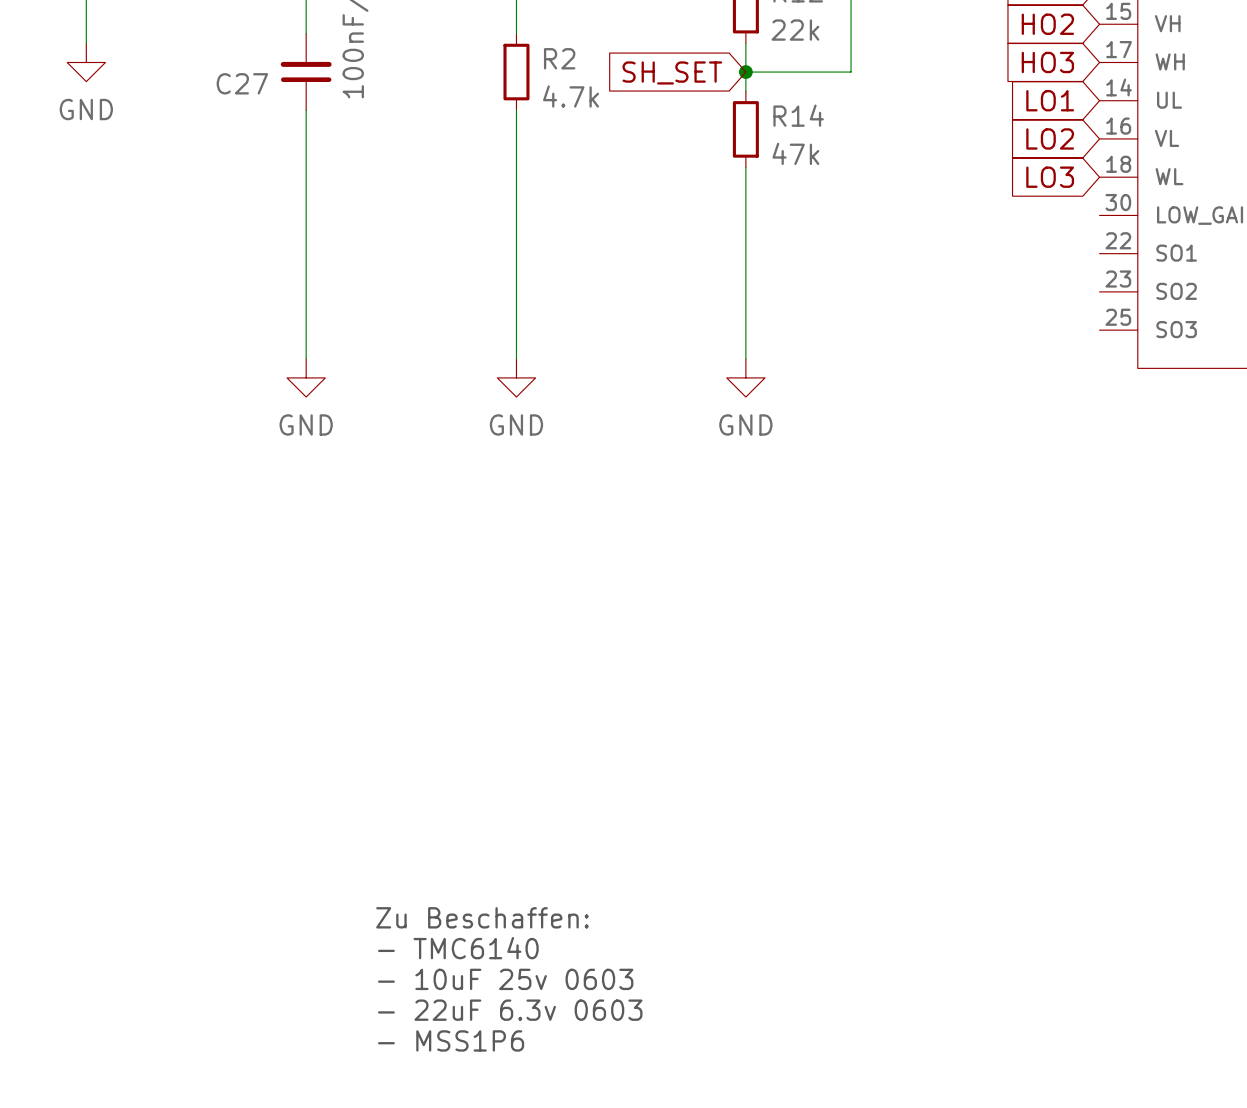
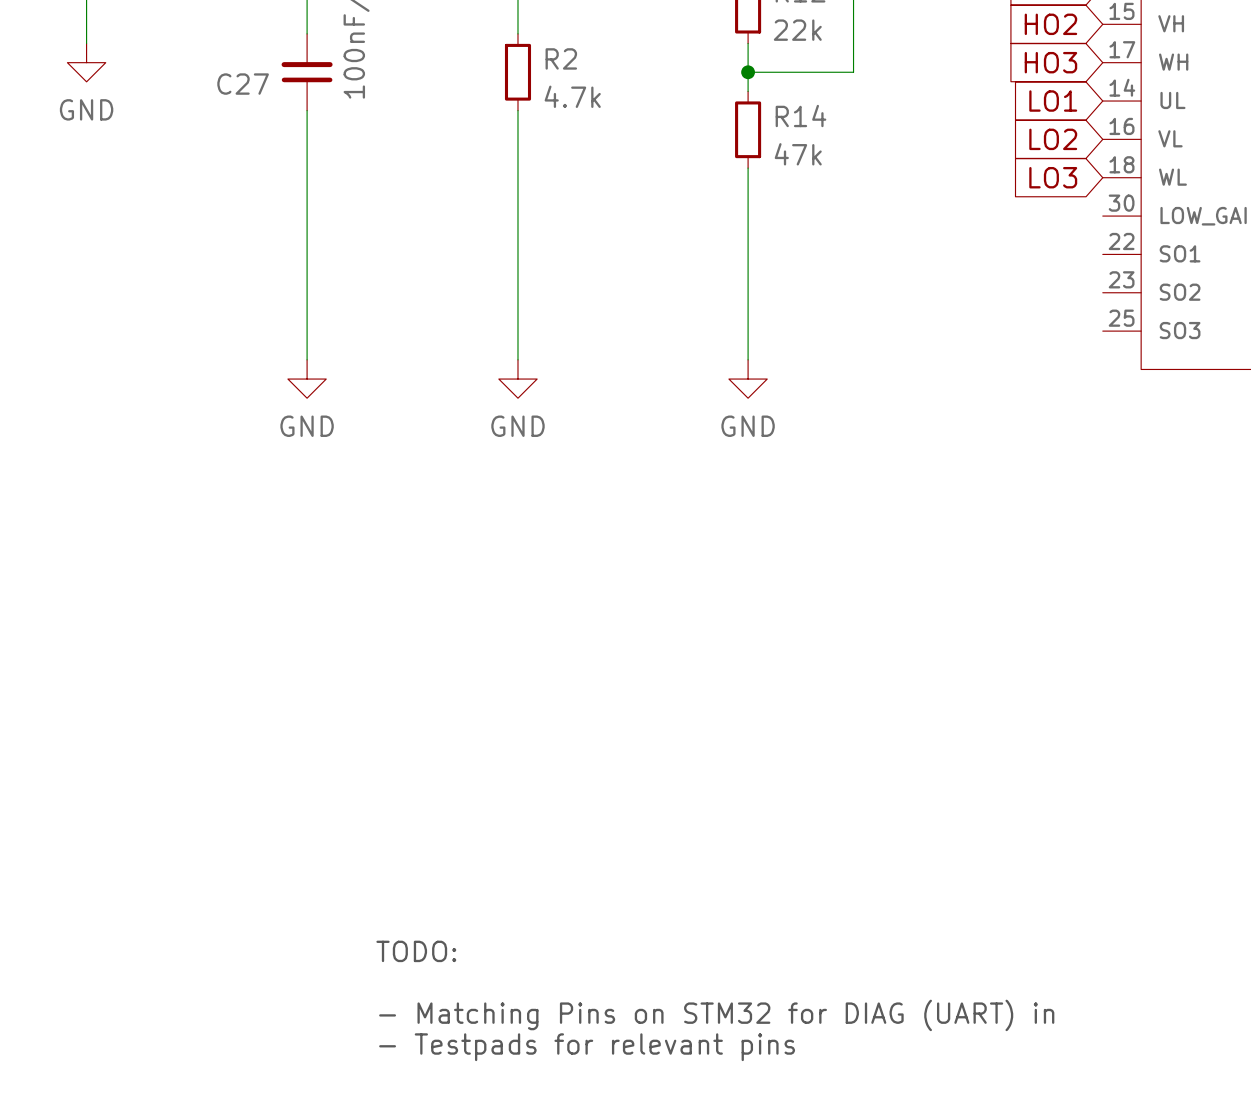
global label: SH_SET (672, 72) -> none
text: Zu Beschaffen: (482, 917) -> none
text: - TMC6140 (458, 948) -> TODO: (416, 951)
text: - 10uF 25v 0603 (505, 979) -> none
text: - 22uF 6.3v 0603 (510, 1010) -> - Matching Pins on STM32 for DIAG (UART) in (716, 1015)
text: - MSS1P6 (451, 1040) -> - Testpads for relevant pins (587, 1047)

